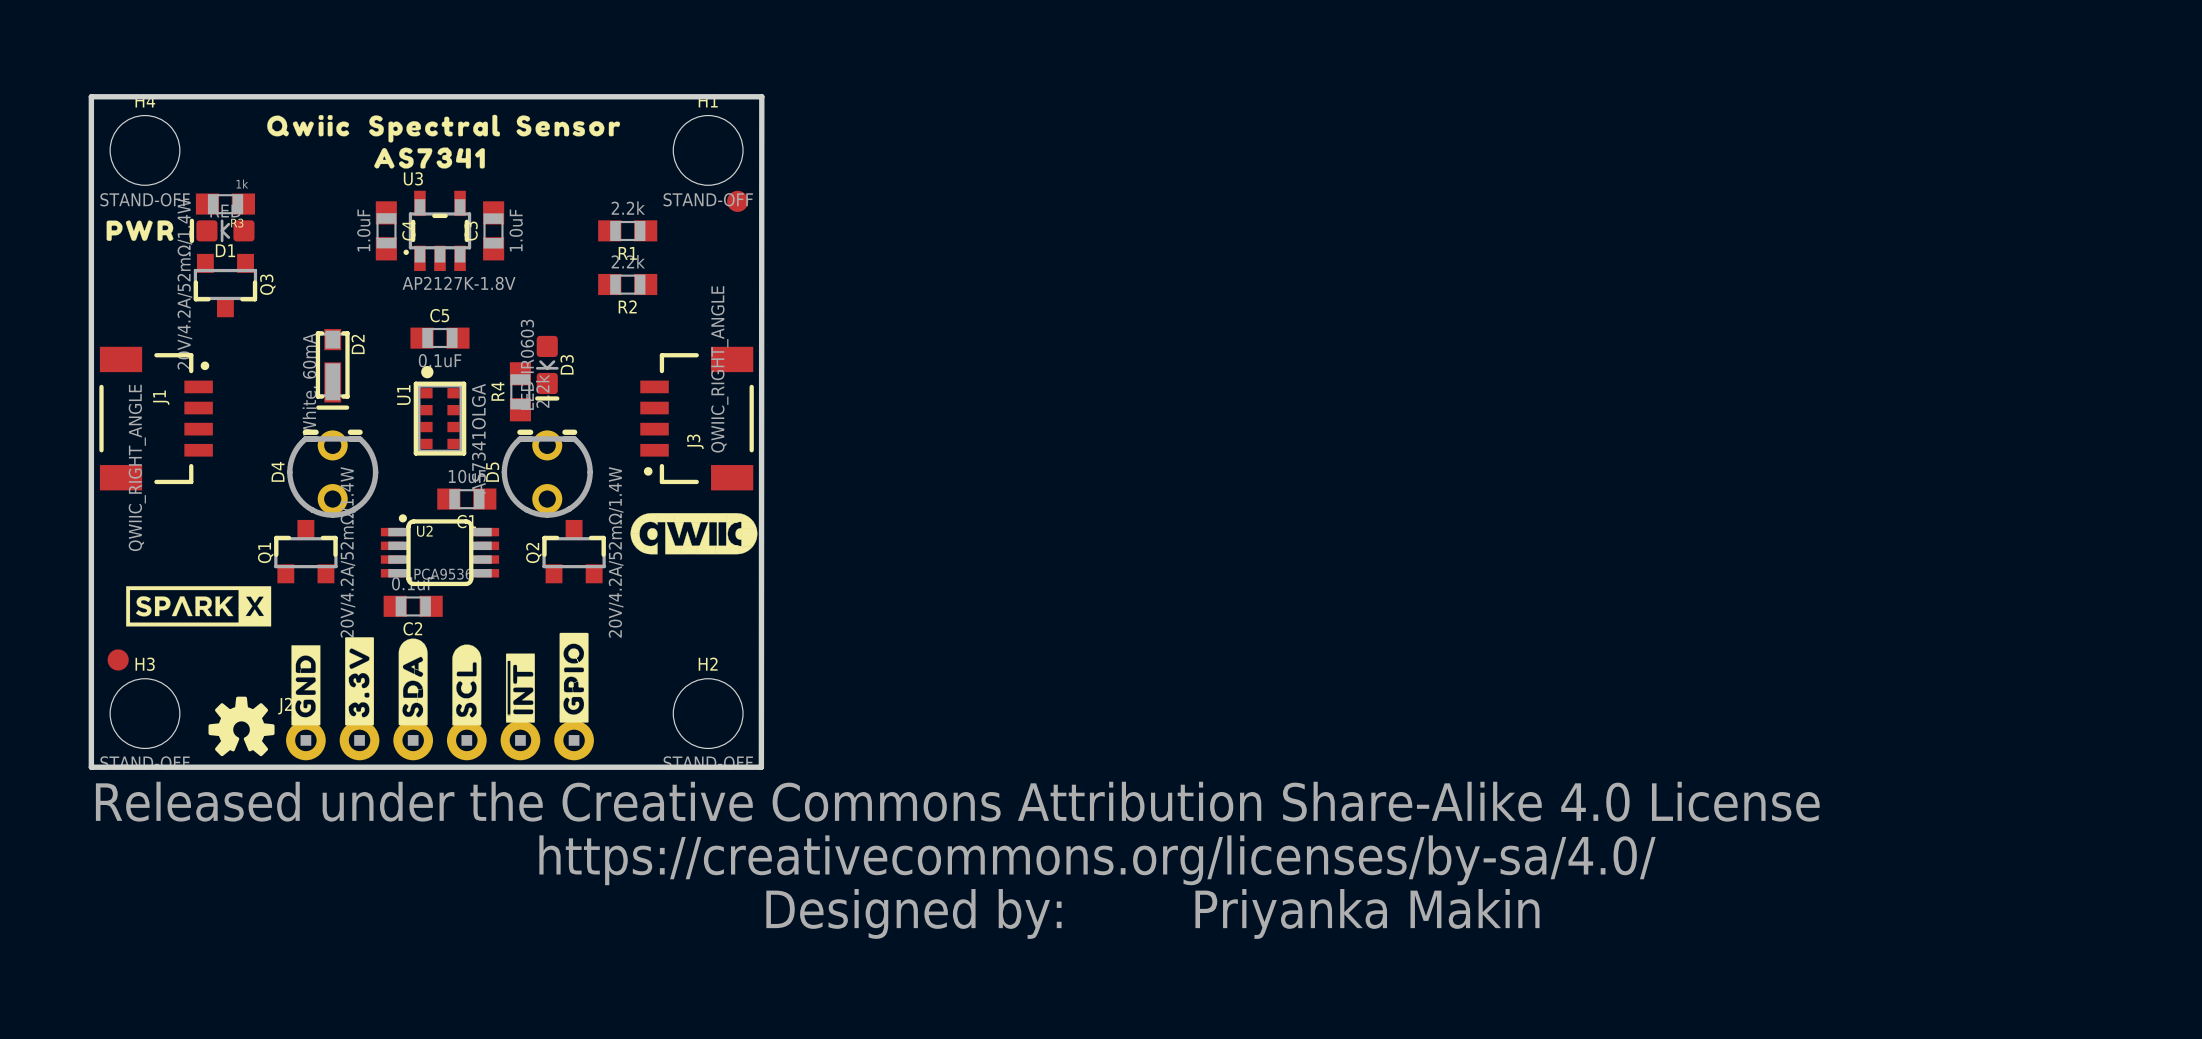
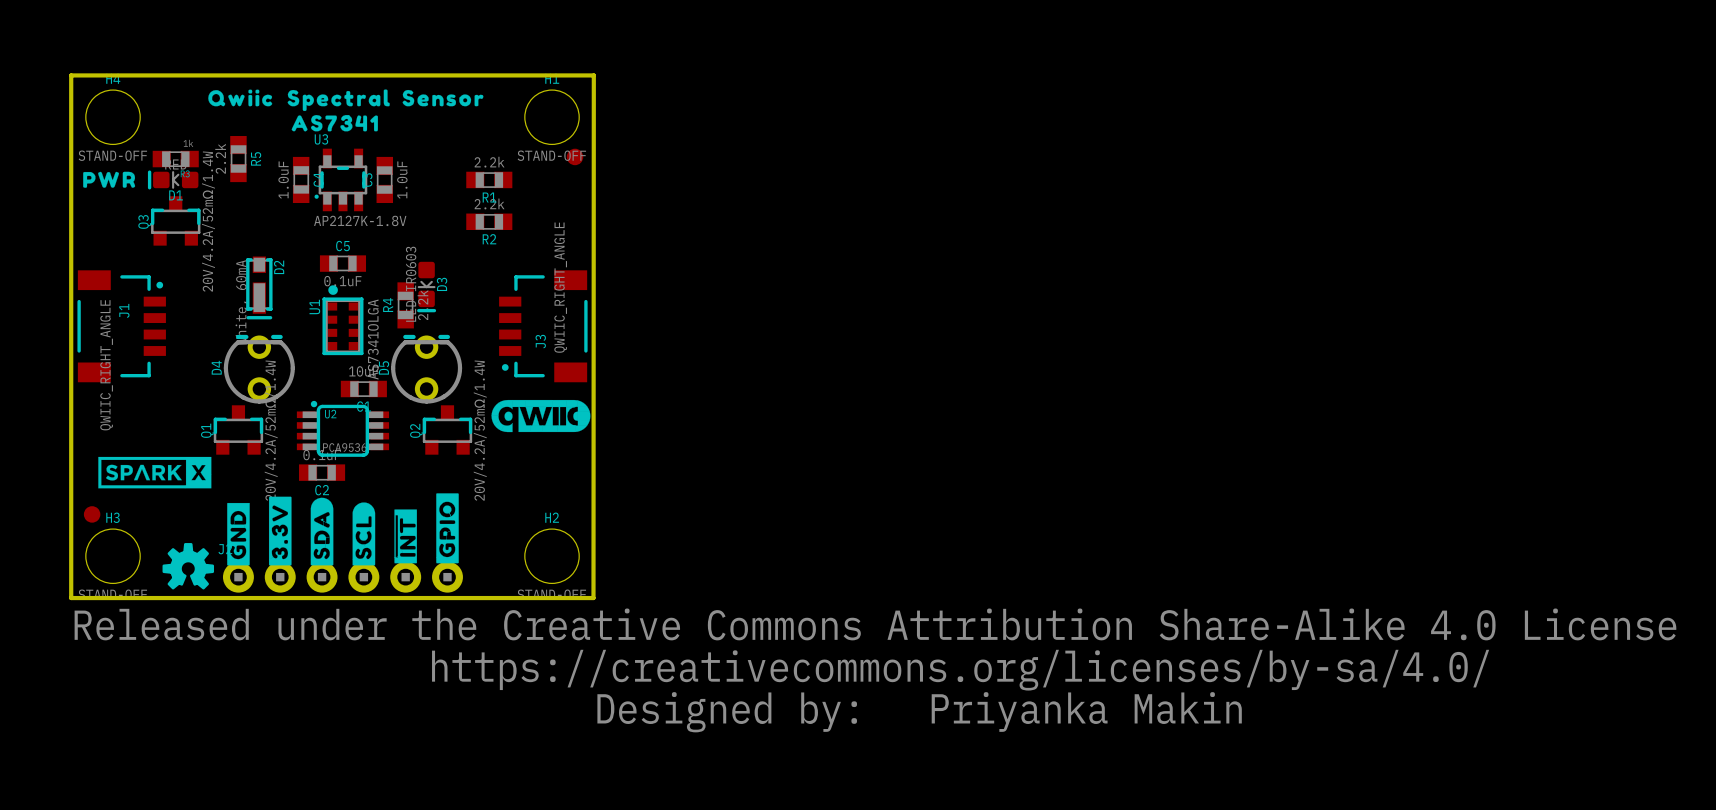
R5: none -> 2.2k (238, 159)
Q3 rotation: 0° (225, 285) -> 180° (175, 220)

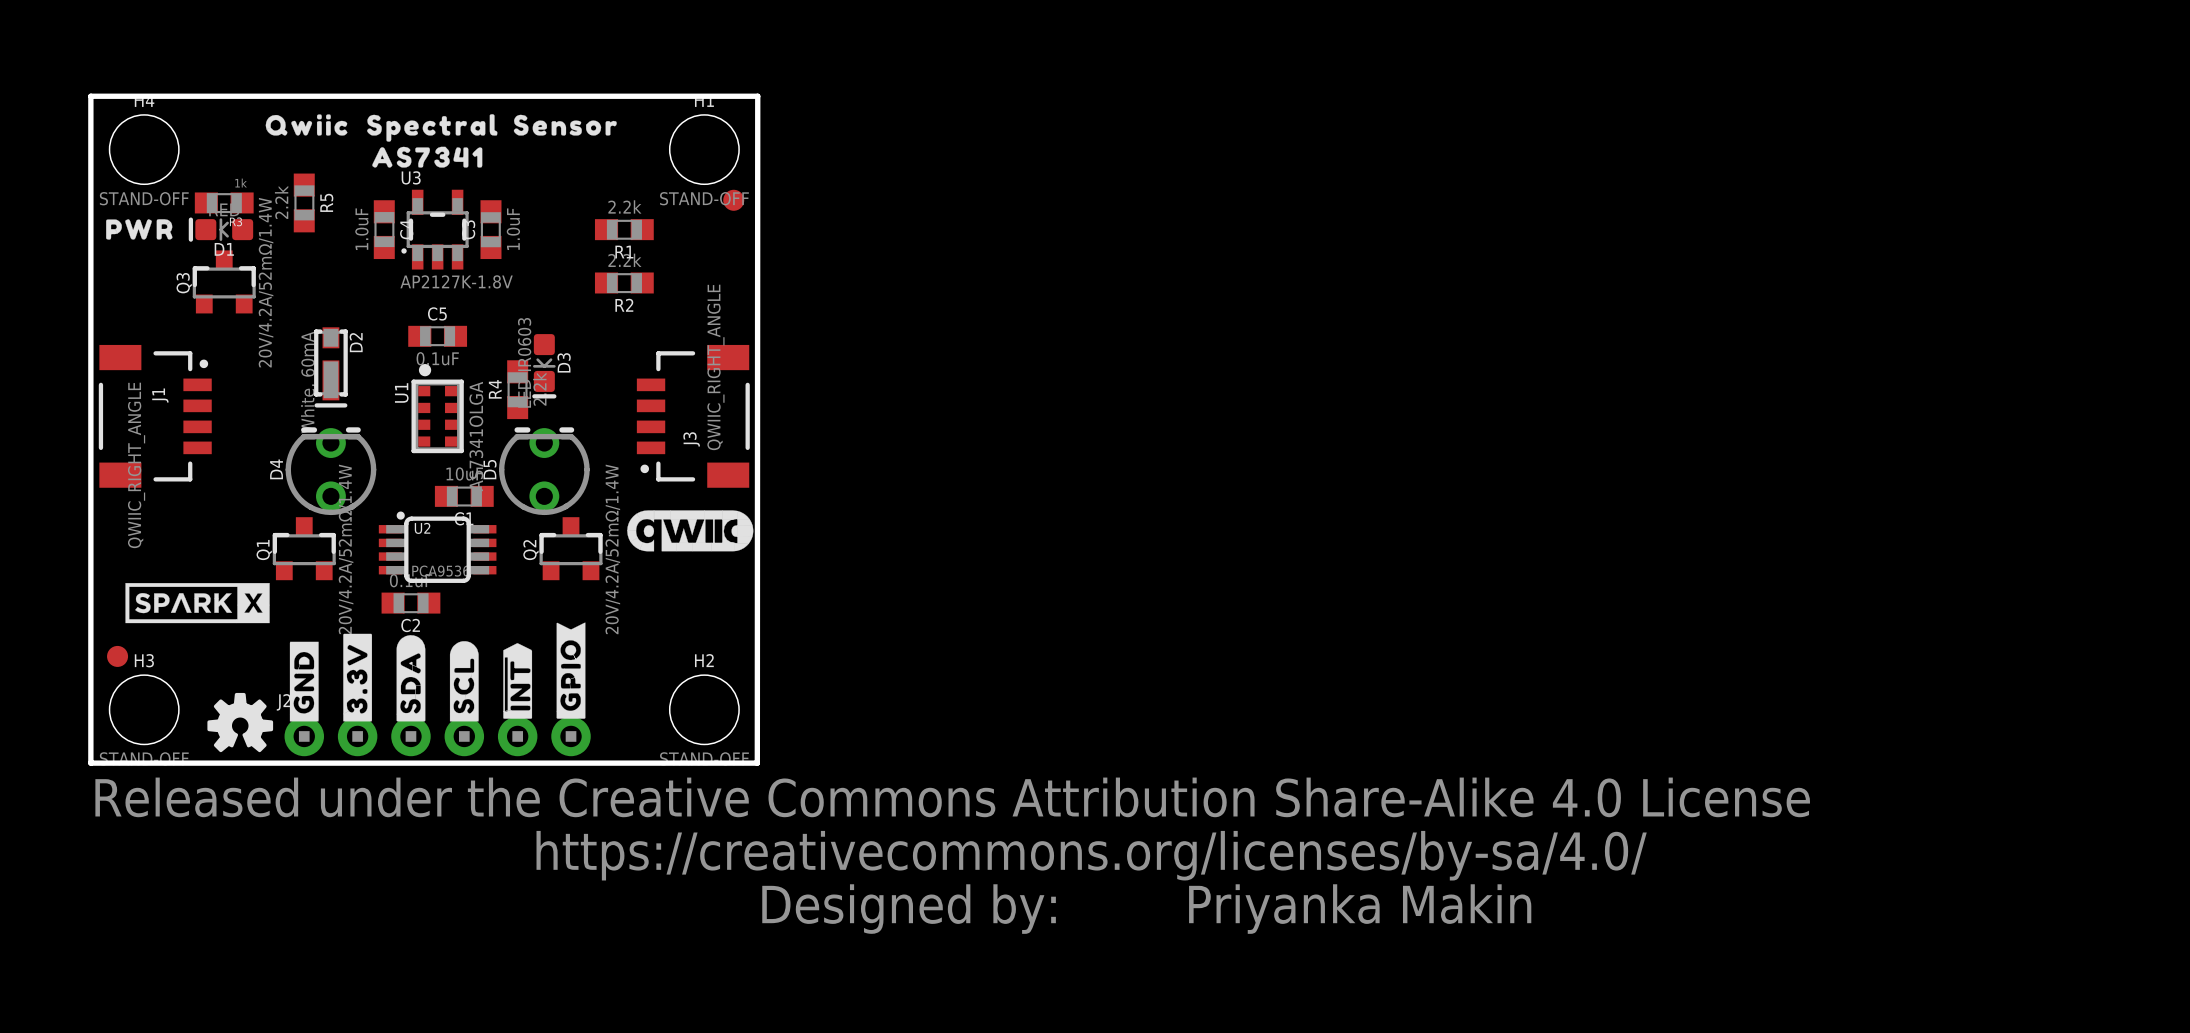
drawing shape: [436, 493, 459, 564] -> [556, 622, 586, 719]
drawing shape: [394, 509, 417, 564] -> [503, 643, 533, 719]

